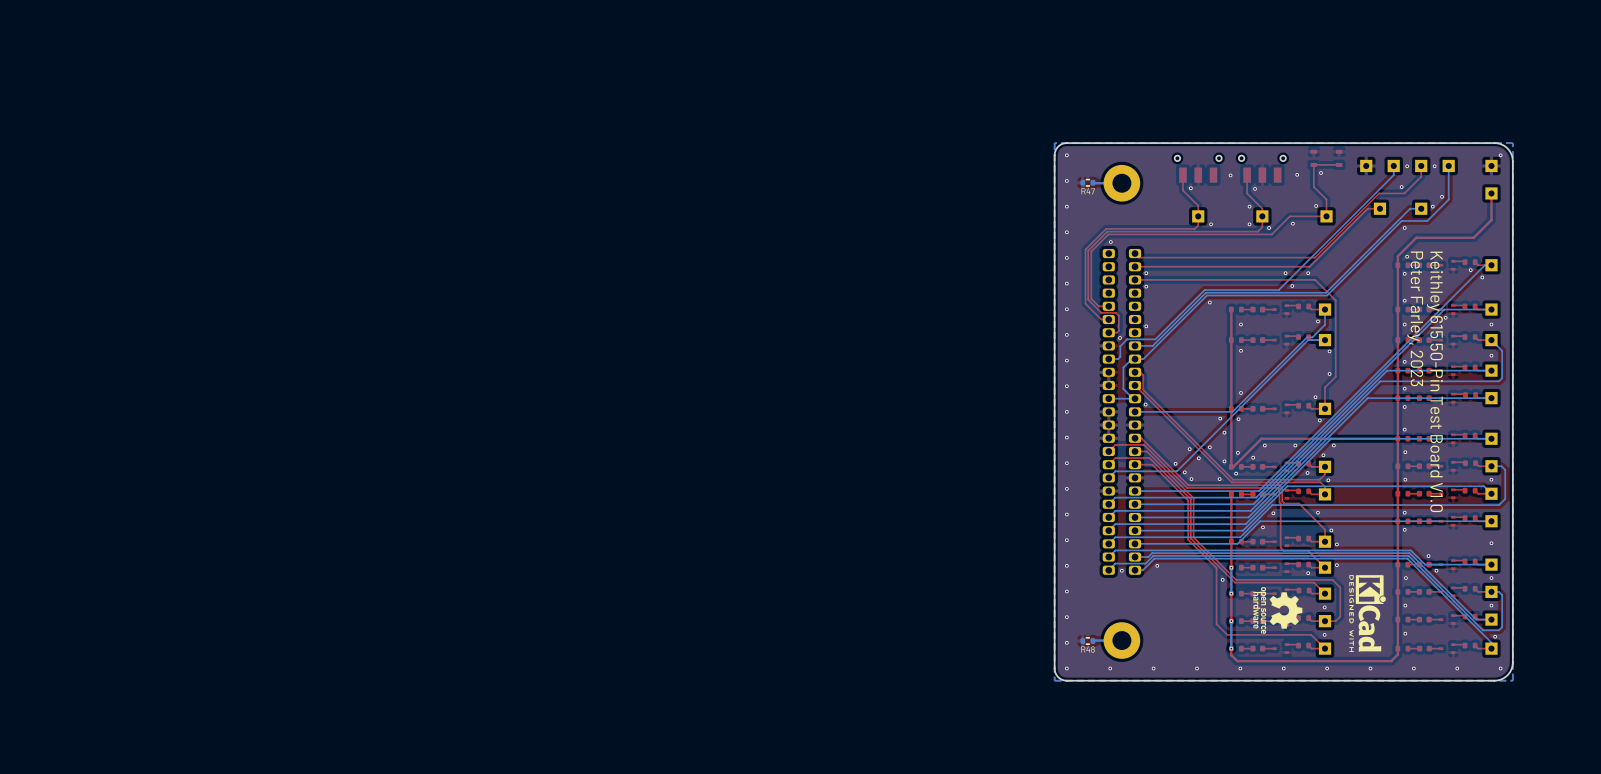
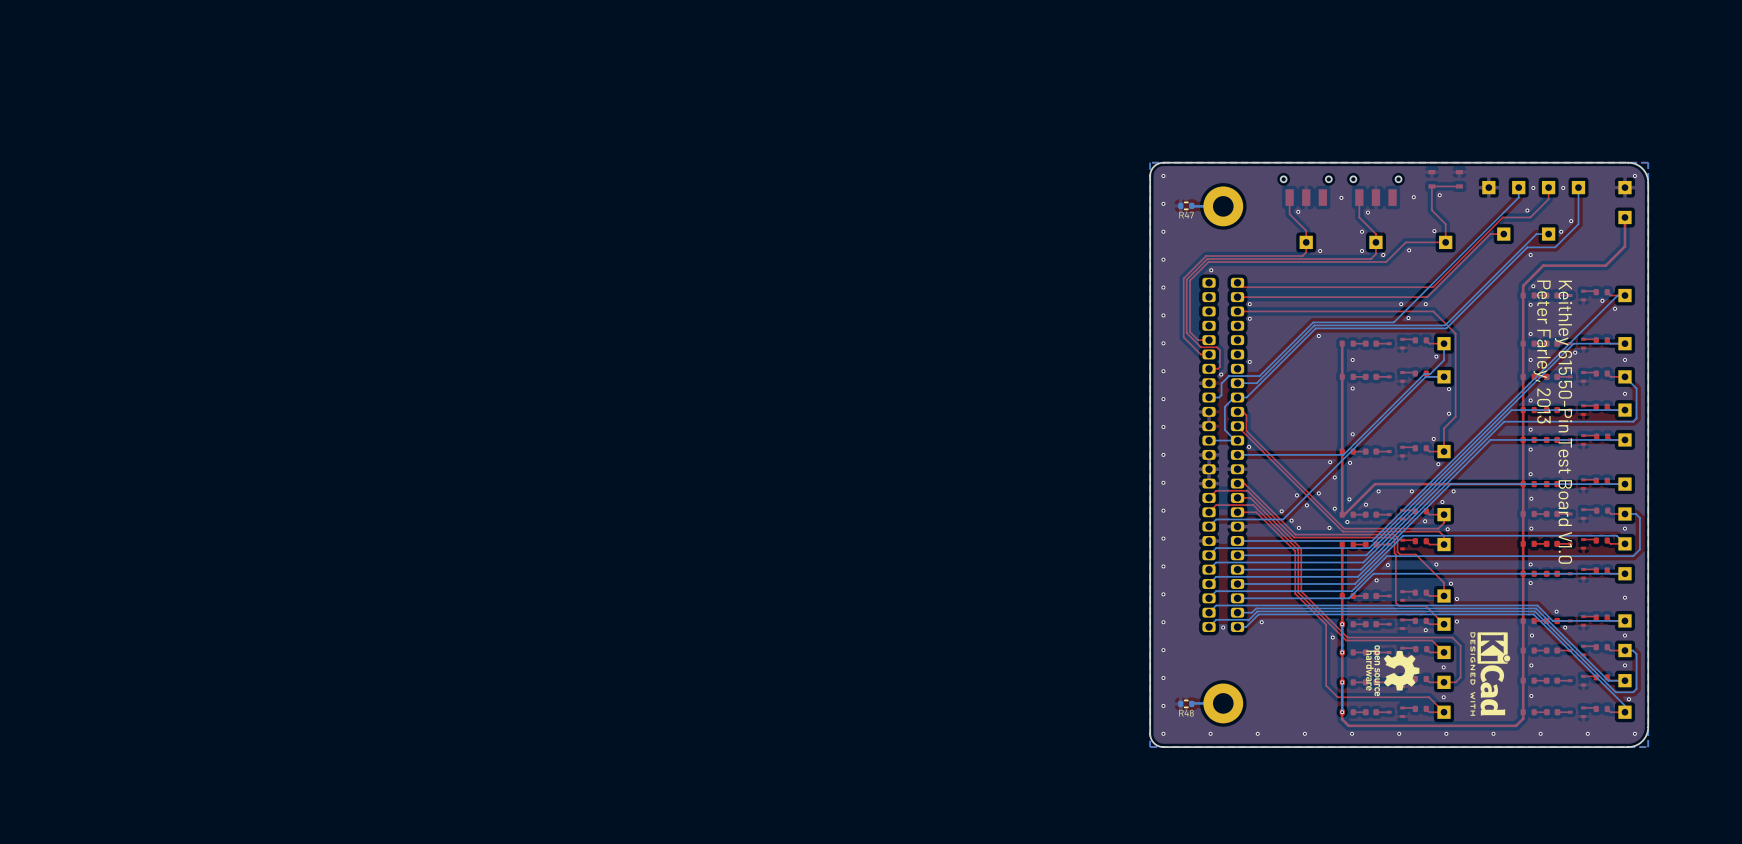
text: Peter Farley, 2023 (1415, 318) -> Peter Farley, 2013 (1542, 352)

